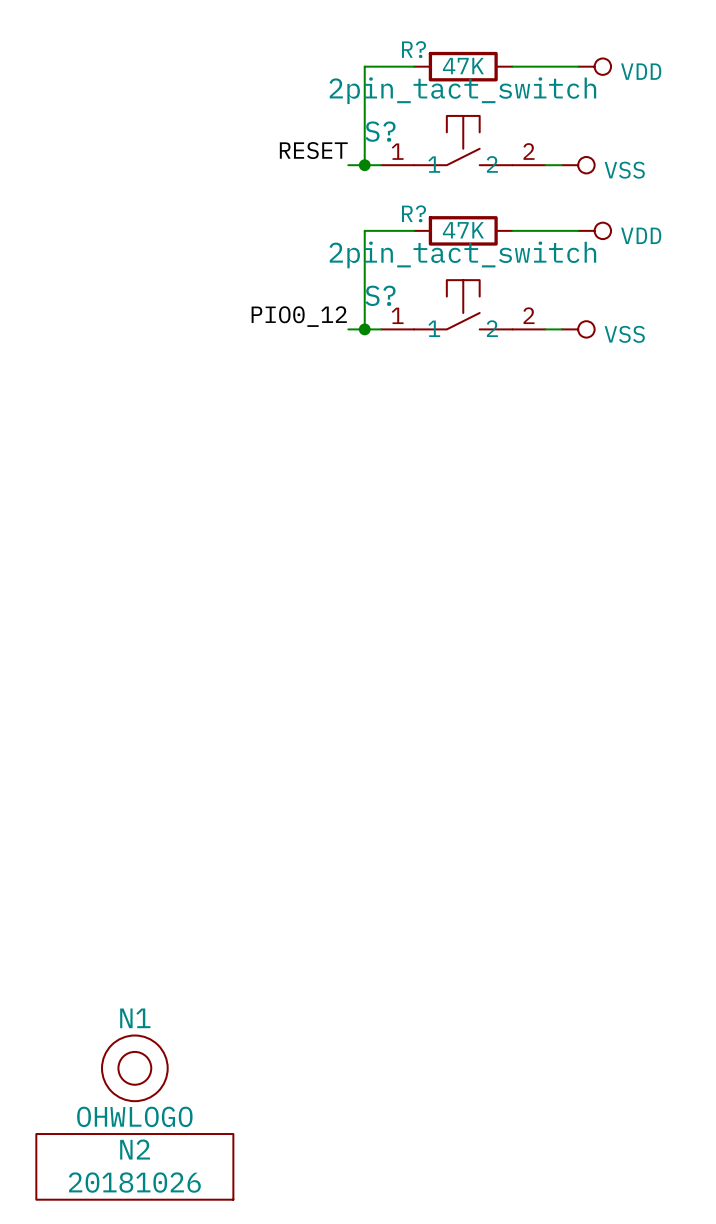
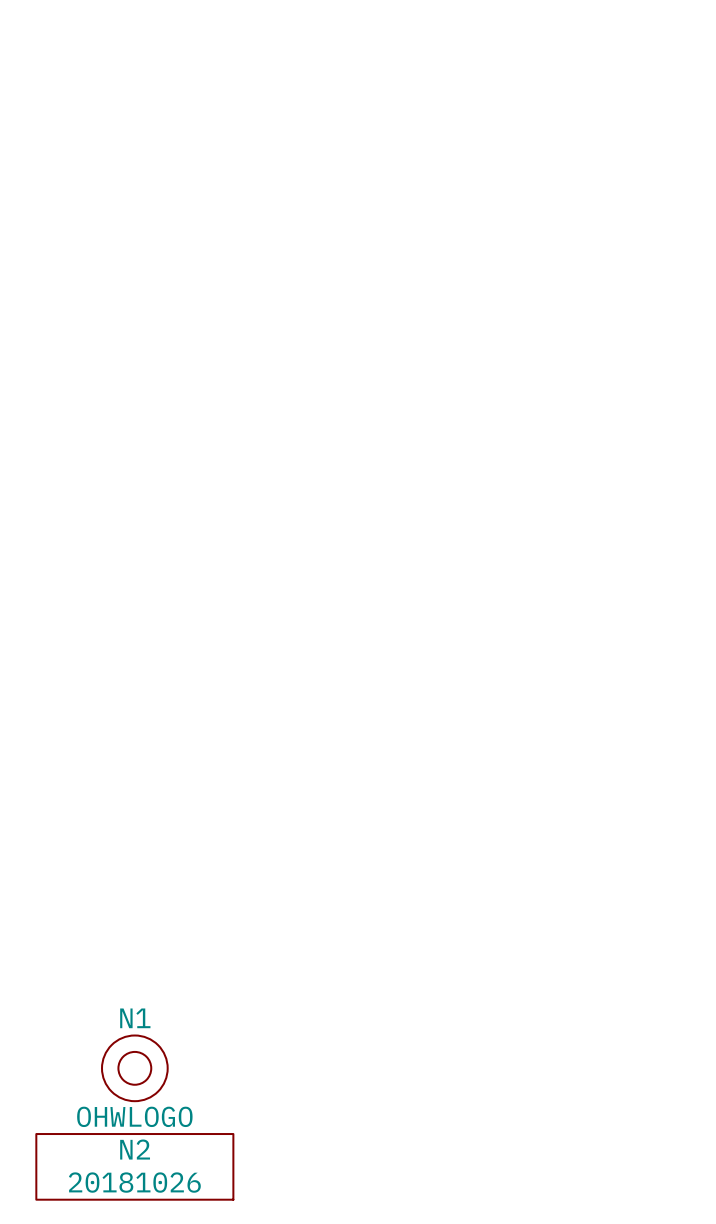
wire: (414, 66) (364, 66) (364, 165) -> none
R?: 47K (463, 66) -> none
wire: (512, 66) (578, 66) -> none
power symbol: VDD (594, 66) -> none
S?: 2pin_tact_switch (463, 140) -> none
label: RESET (313, 150) -> none
wire: (348, 165) (381, 165) -> none
junction: (364, 165) -> none
wire: (545, 165) (561, 165) -> none
power symbol: VSS (578, 165) -> none
wire: (414, 230) (364, 230) (364, 329) -> none
R?: 47K (463, 230) -> none
wire: (512, 230) (578, 230) -> none
power symbol: VDD (594, 230) -> none
S?: 2pin_tact_switch (463, 304) -> none
label: PIO0_12 (299, 316) -> none
wire: (348, 329) (381, 329) -> none
junction: (364, 329) -> none
wire: (545, 329) (561, 329) -> none
power symbol: VSS (578, 329) -> none

